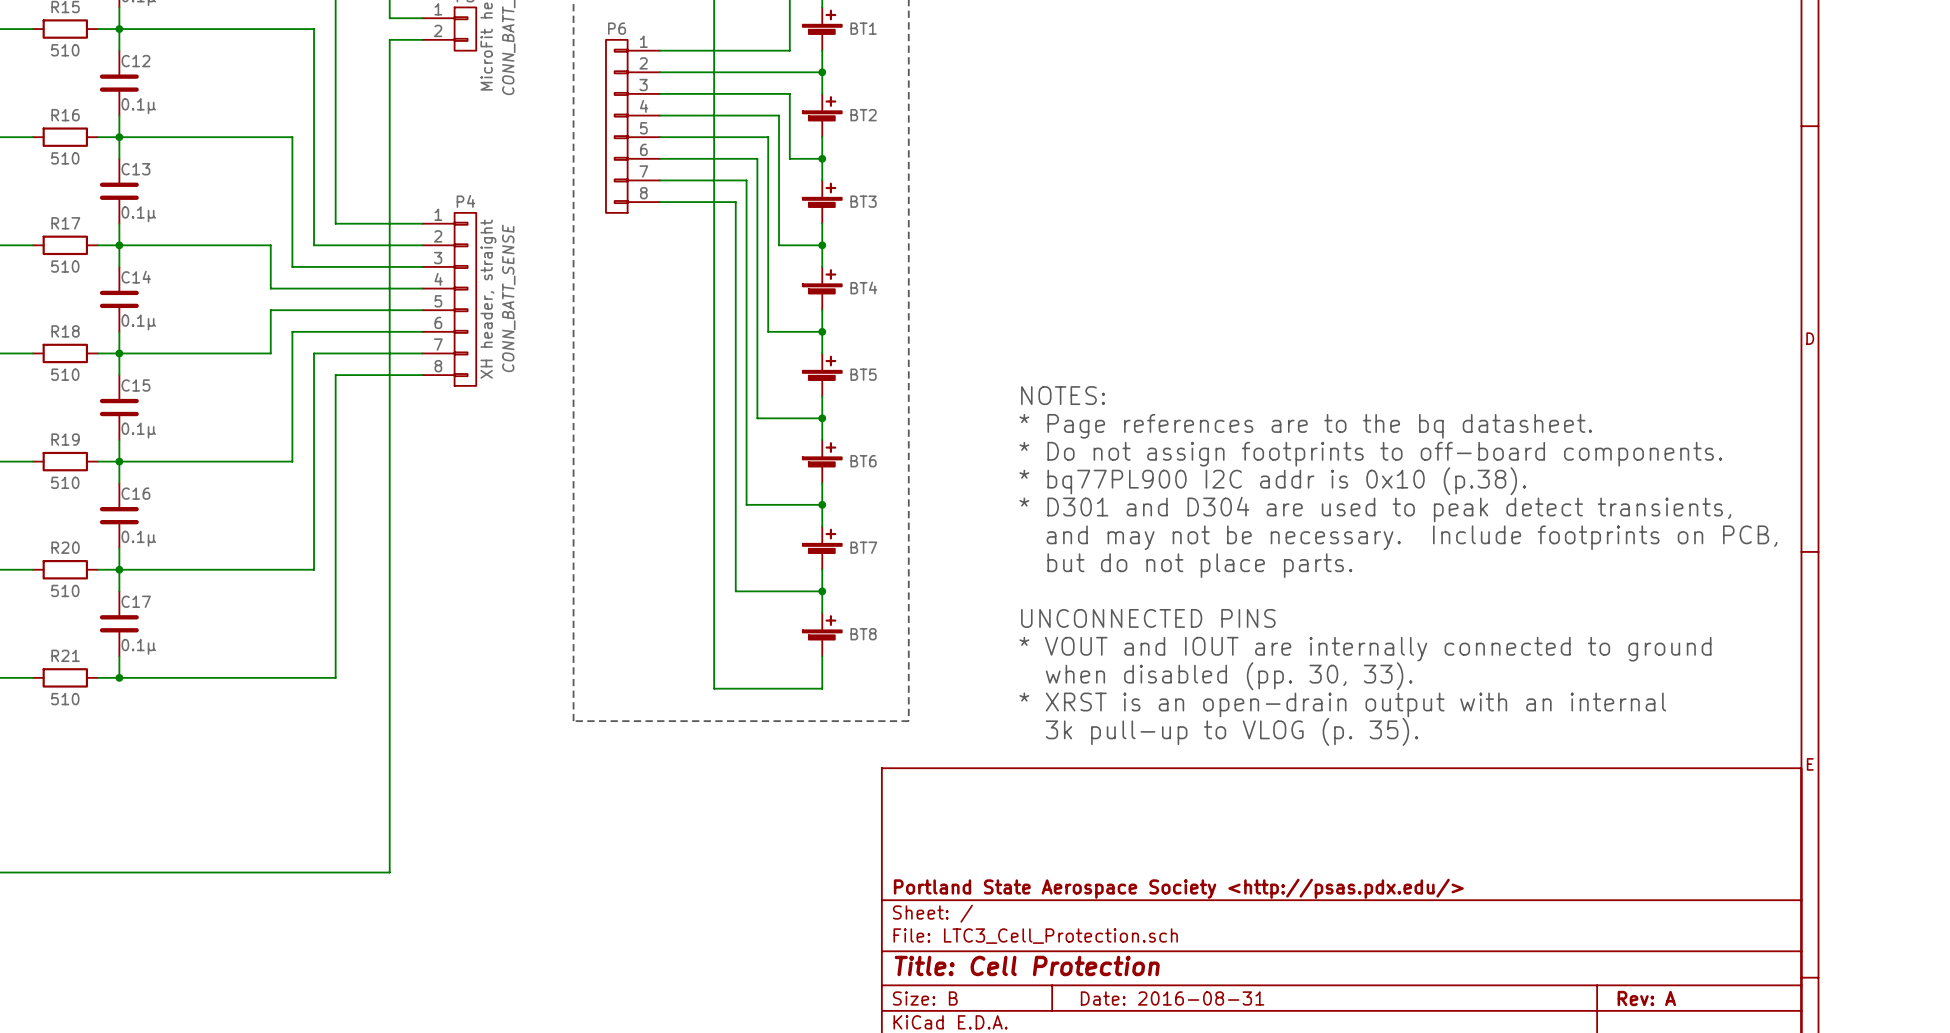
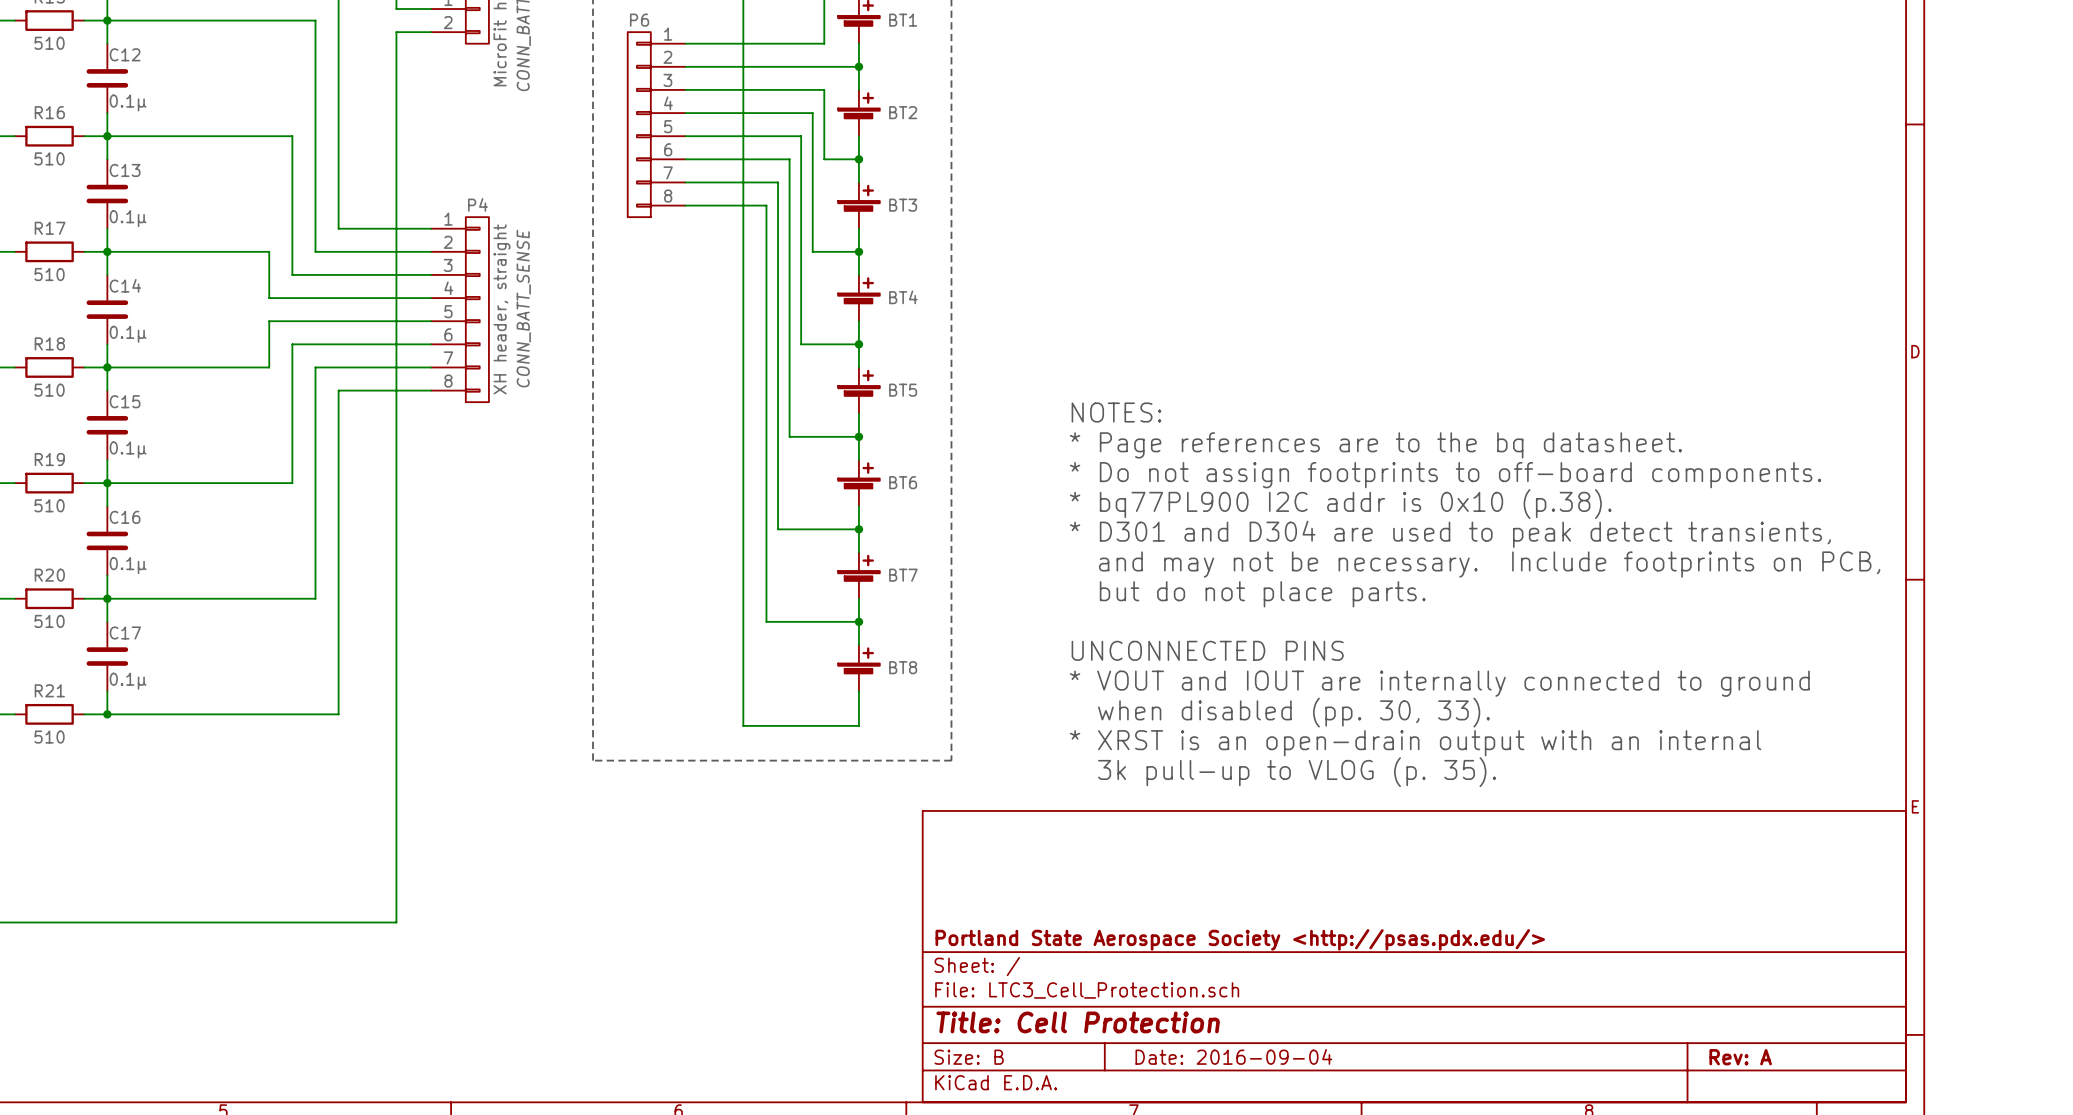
title block: Date: 2016-08-31 (1172, 998) -> Date: 2016-09-04 (1233, 1056)

